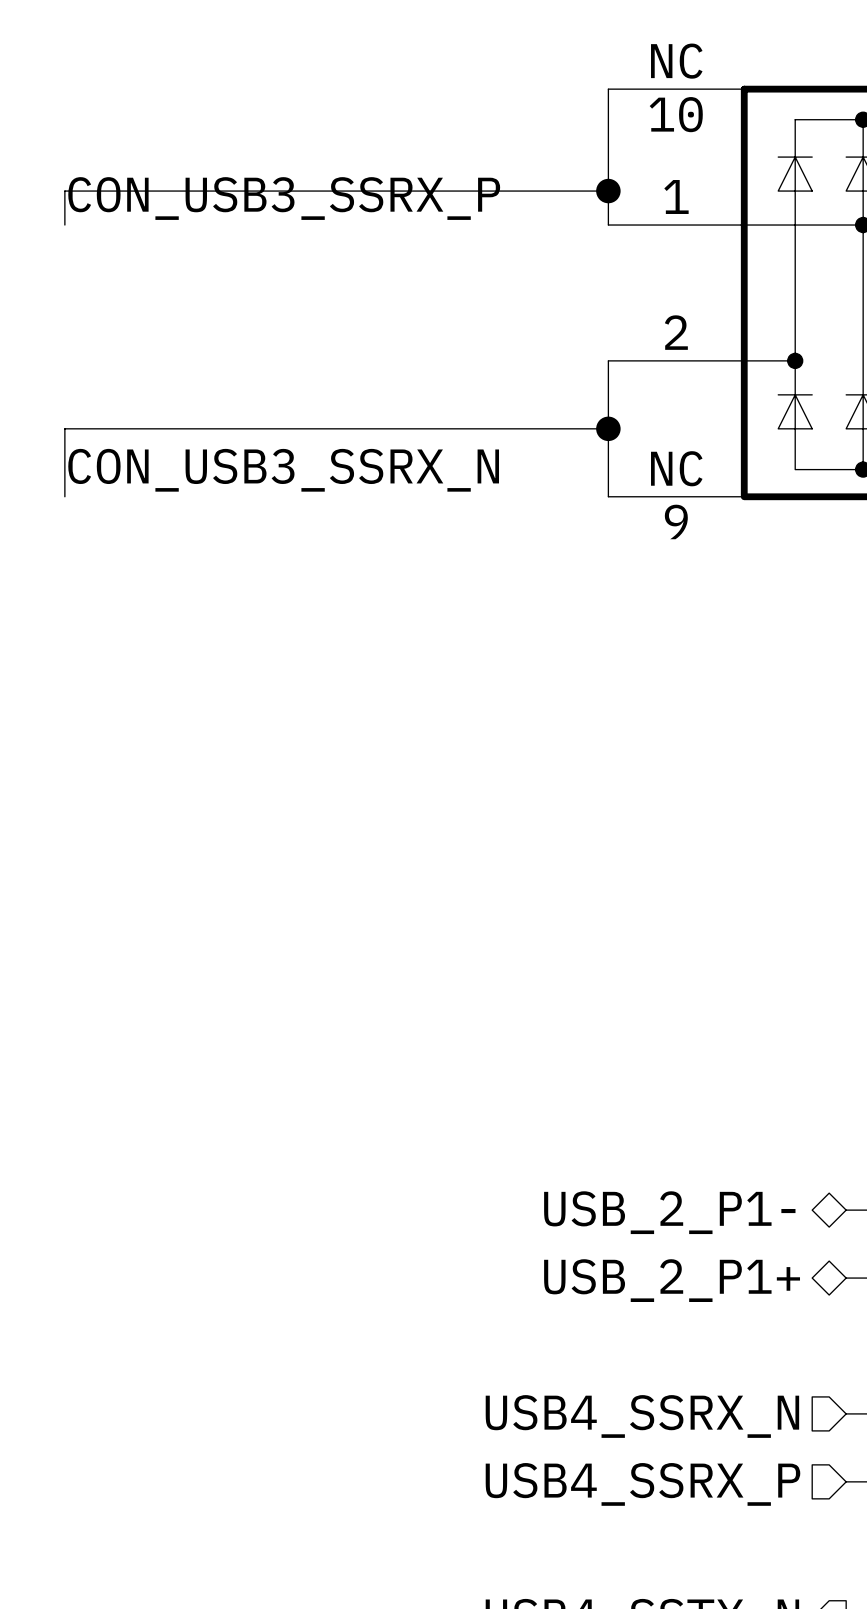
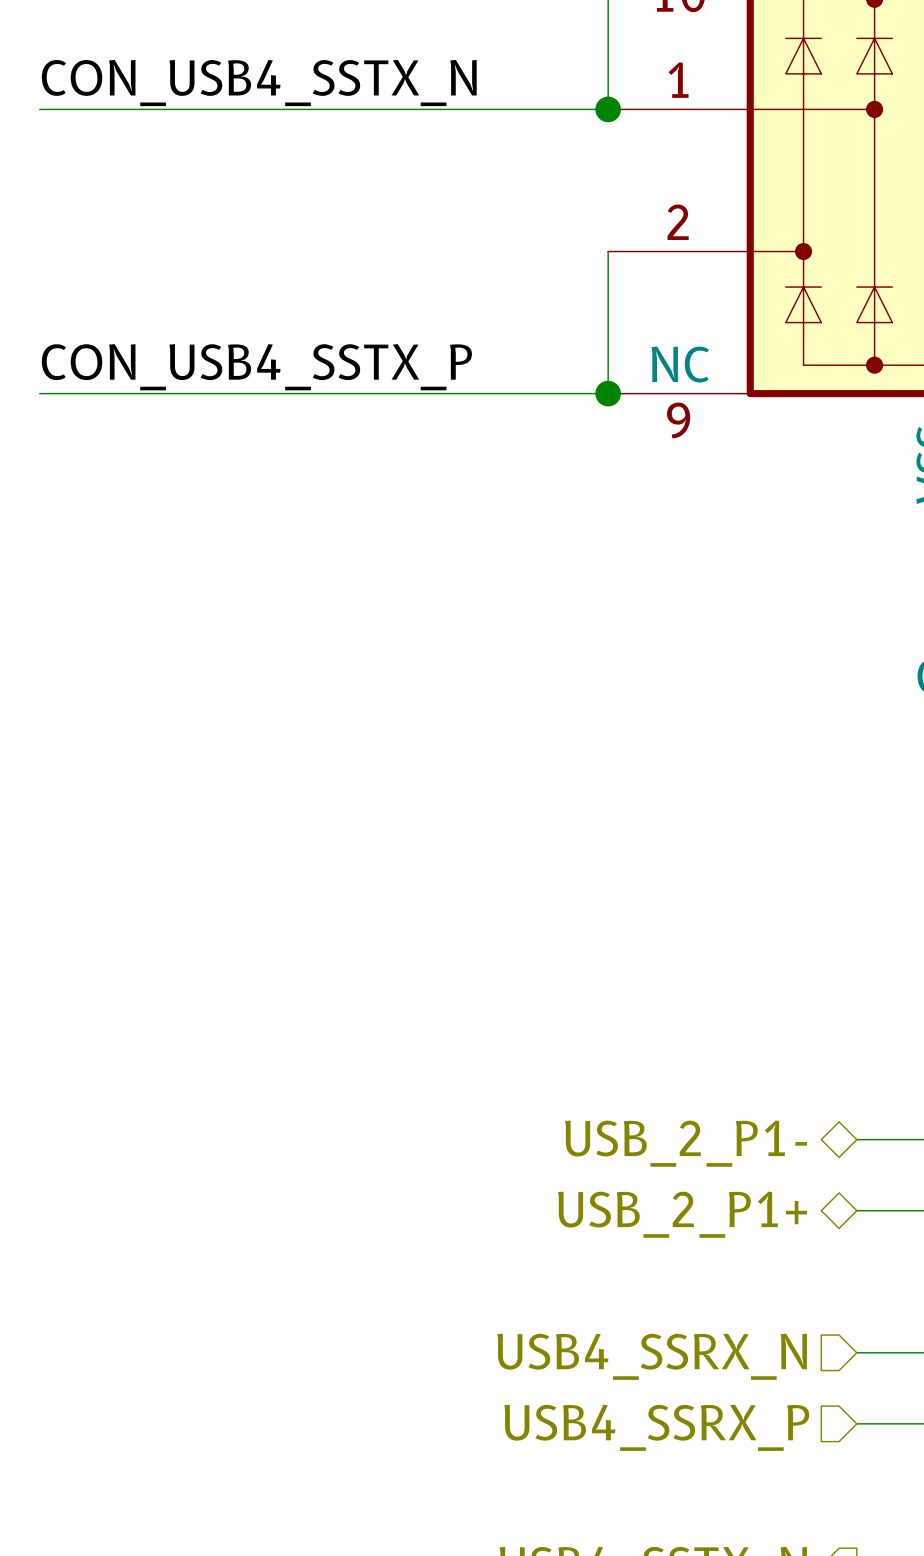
wire: (608, 191) (64, 191) (64, 225) -> (608, 109) (39, 109)
junction position: (608, 191) -> (608, 109)
label: CON_USB3_SSRX_P (284, 198) -> CON_USB4_SSTX_N (259, 83)
wire: (608, 428) (64, 428) (64, 496) -> (608, 393) (39, 393)
junction position: (608, 428) -> (608, 393)
label: CON_USB3_SSRX_N (283, 470) -> CON_USB4_SSTX_P (256, 367)

